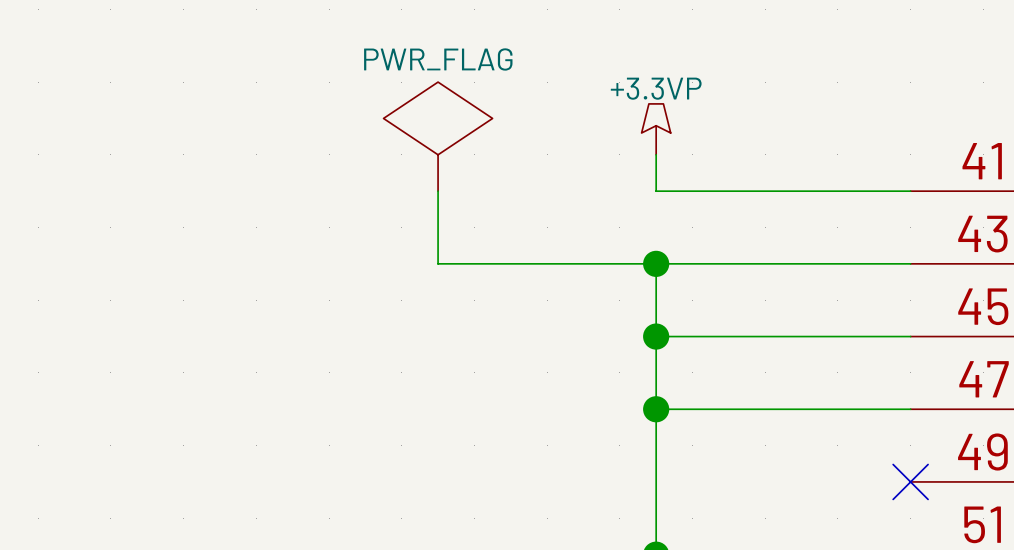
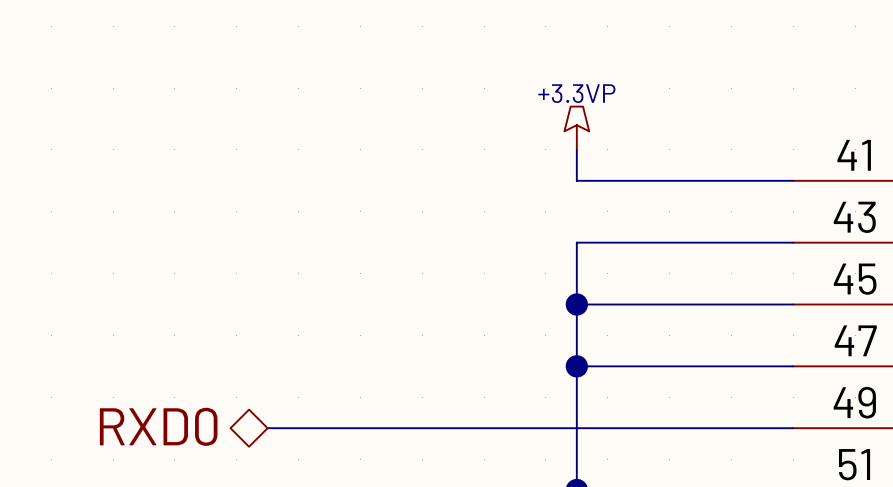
power symbol: PWR_FLAG (438, 136) -> none
wire: (438, 191) (438, 263) (656, 263) -> none
junction: (656, 263) -> none
hierarchical label: none -> RXD0 (158, 426)
wire: none -> (267, 428) (793, 428)
no-connect mark: (910, 481) -> none

